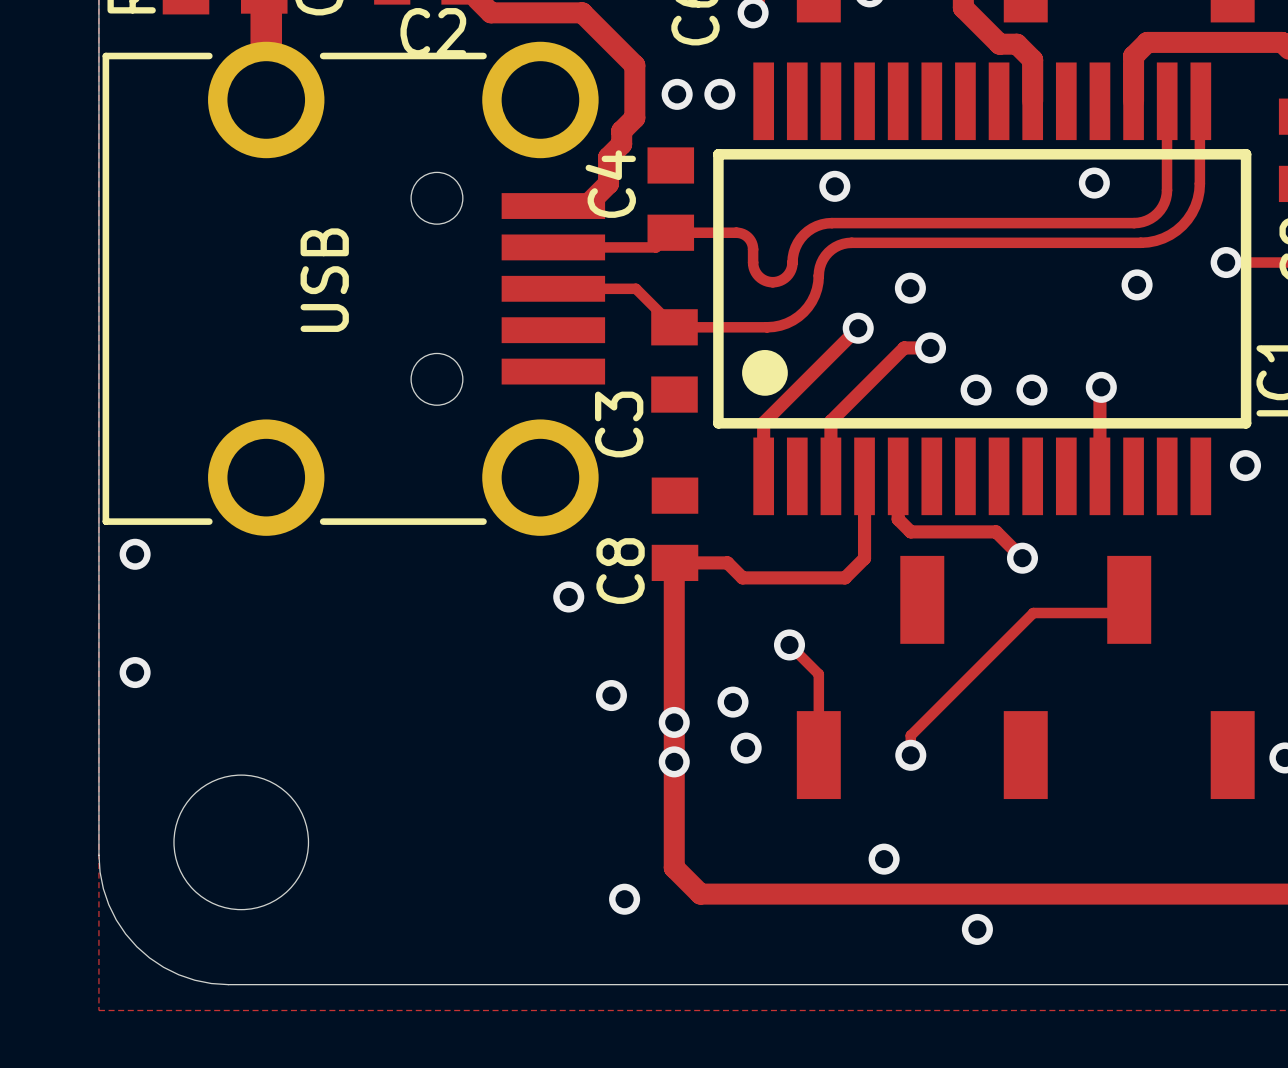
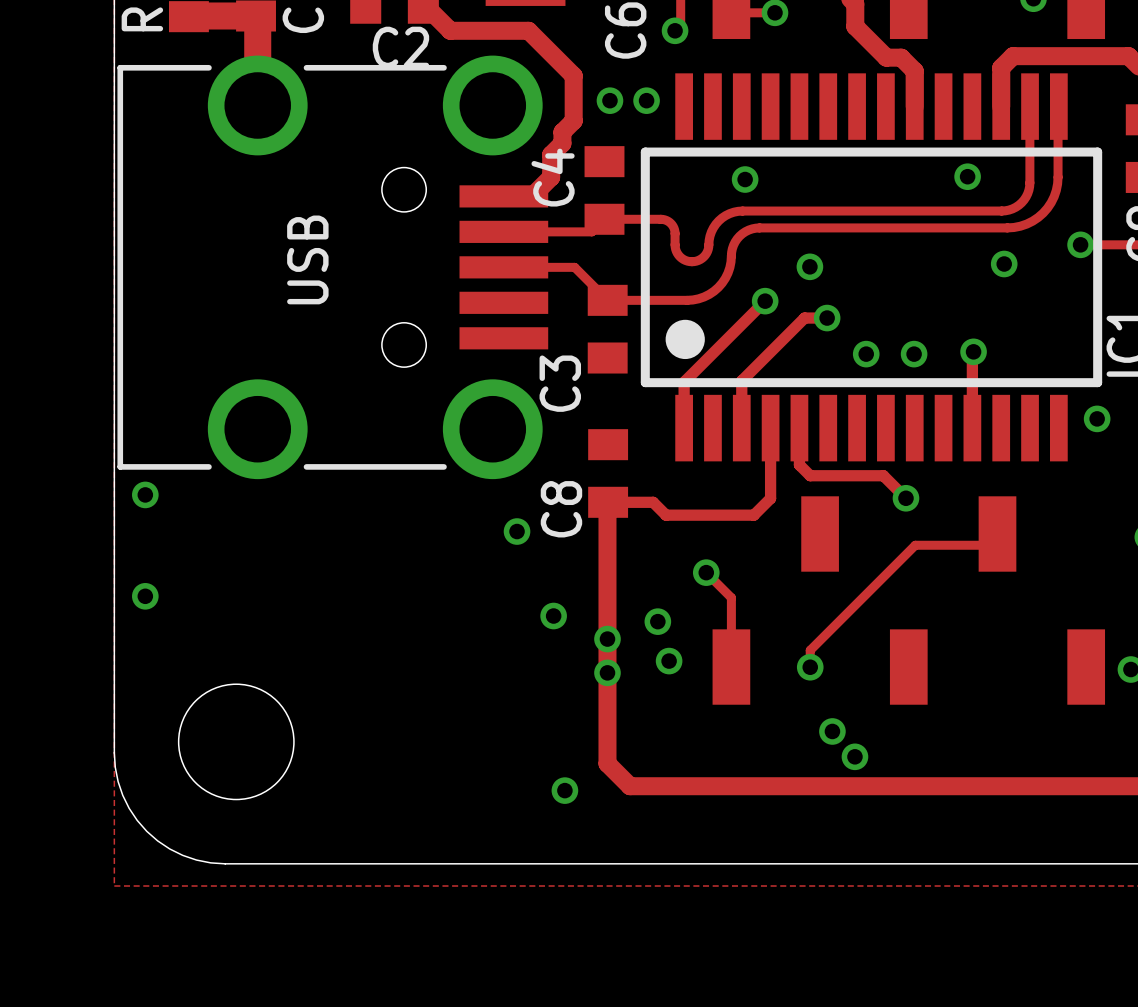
via: none -> (832, 731)
via: (884, 859) -> none
via: none -> (854, 756)
via: (977, 929) -> none

